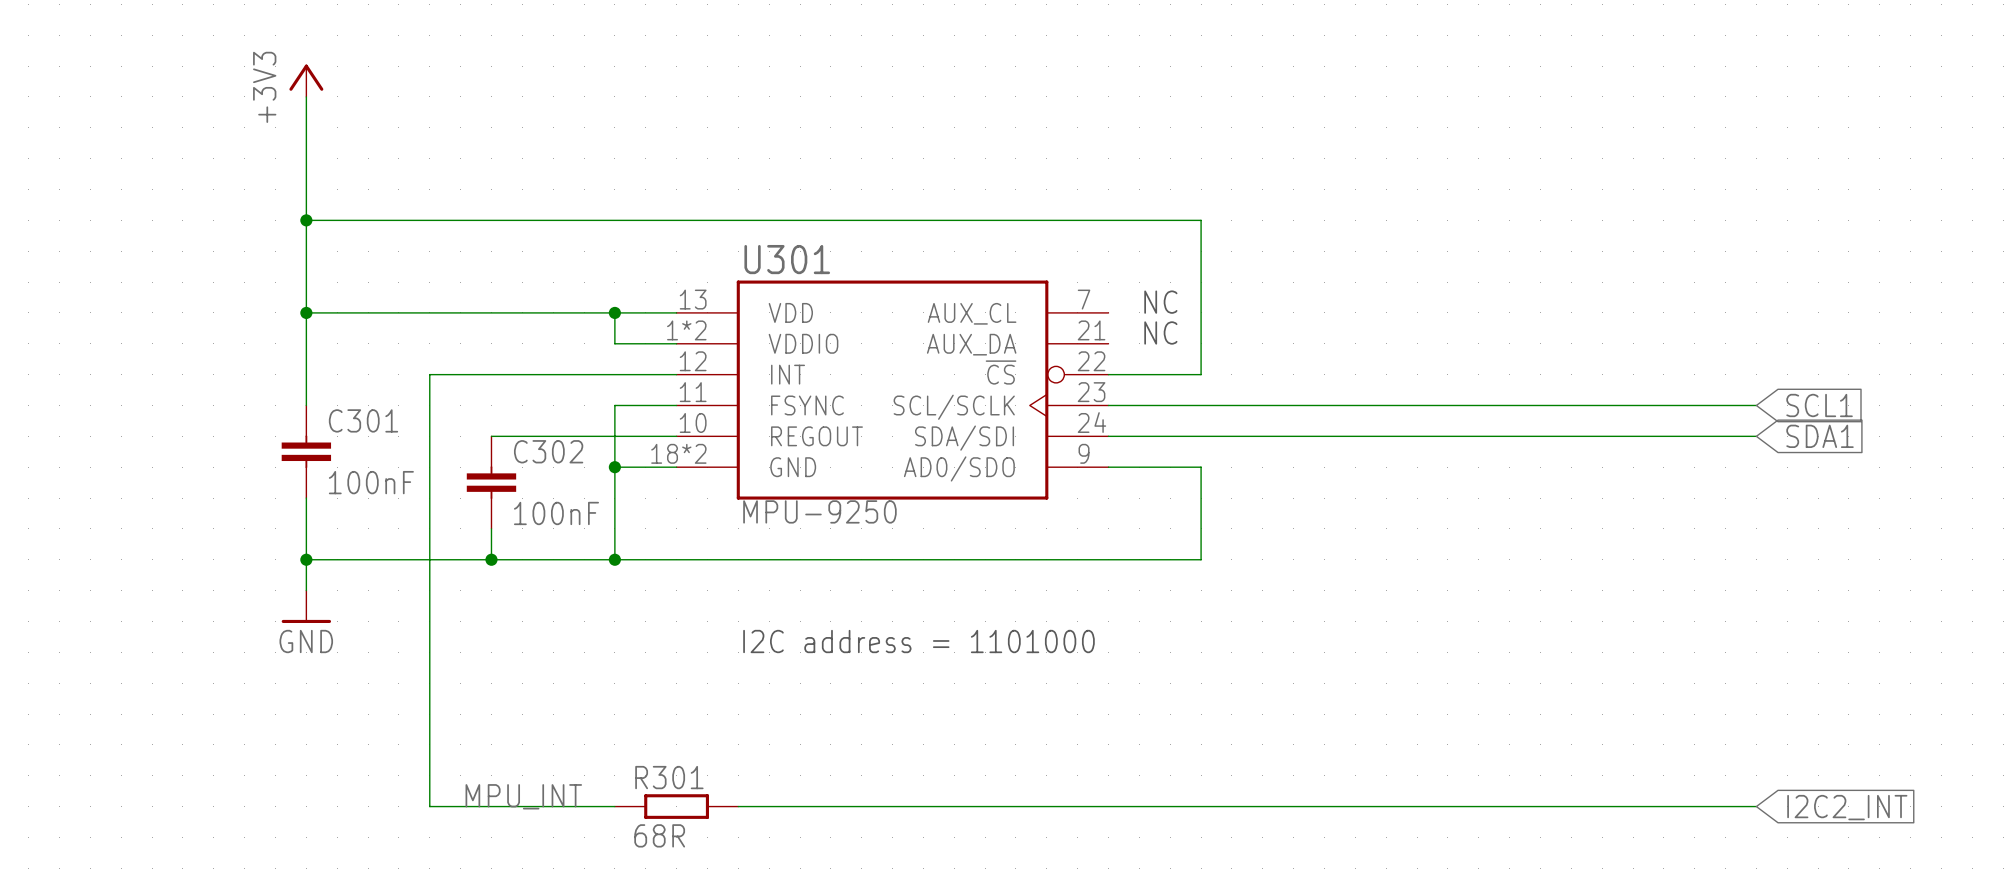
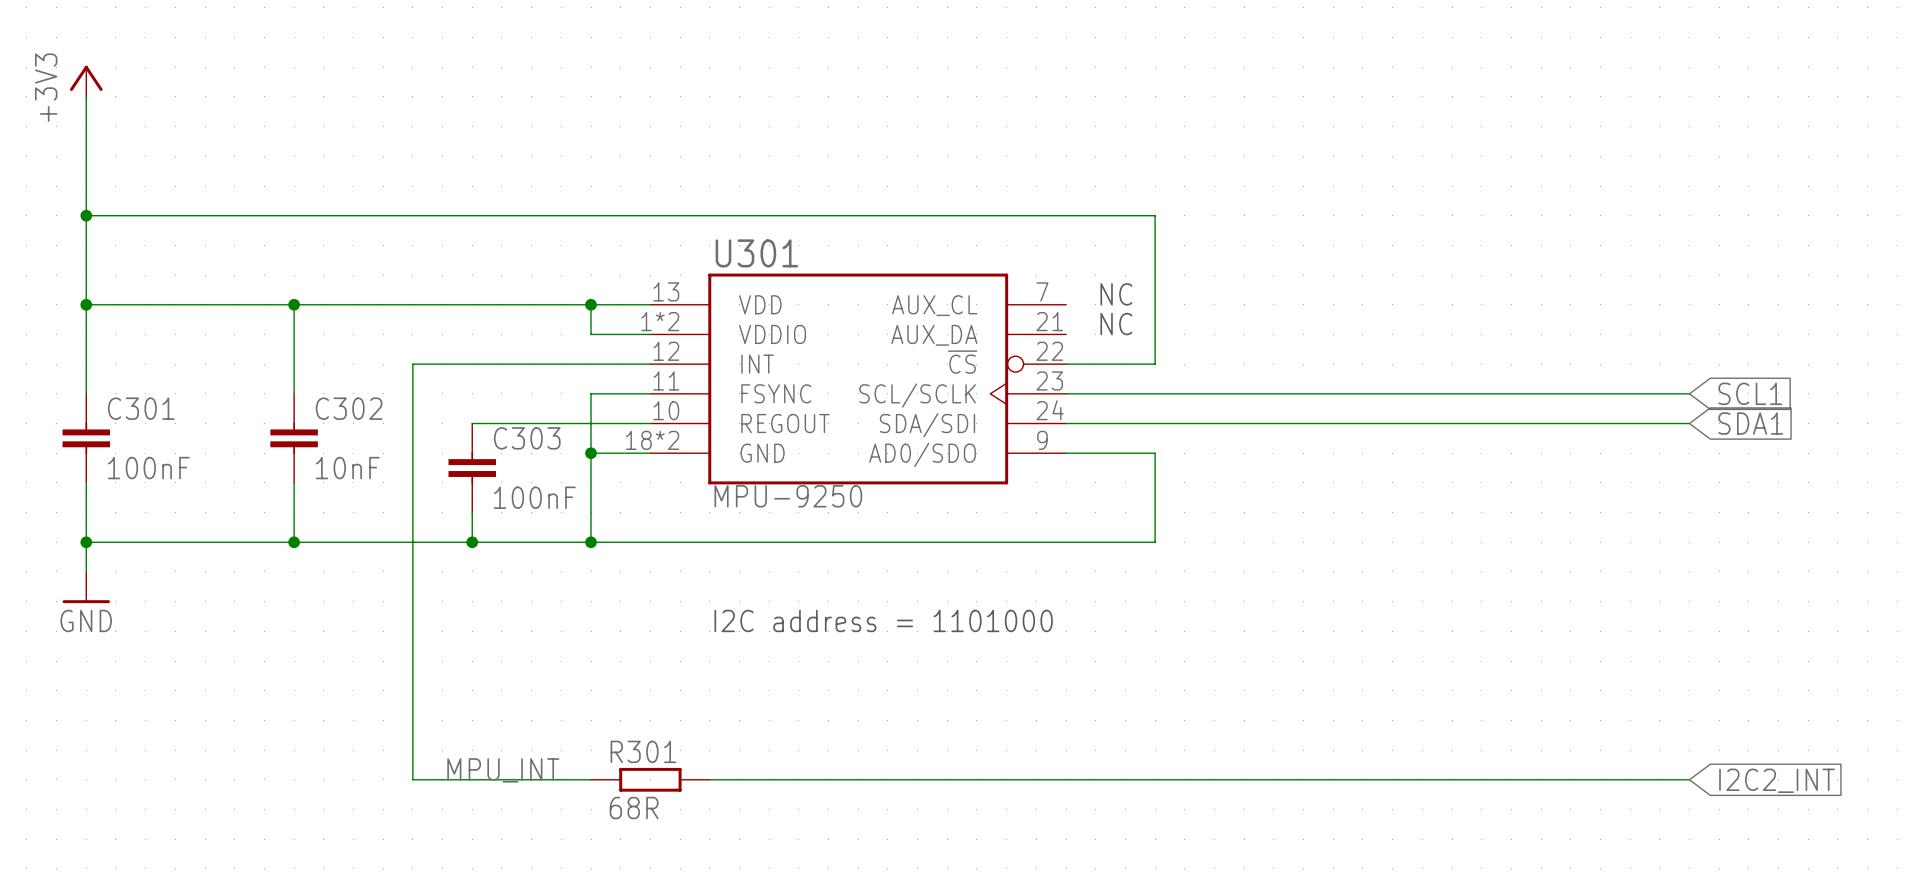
power symbol position: +3V3 (306, 80) -> +3V3 (86, 81)
wire: none -> (86, 96) (86, 393)
wire: (306, 96) (306, 312) -> (86, 304) (294, 304)
wire: none -> (86, 215) (294, 215)
junction: none -> (86, 215)
junction: (306, 220) -> none
junction: none -> (86, 304)
C301 name: C301 (363, 420) -> C302 (349, 408)
C301: none -> 100nF (86, 438)
C302 name: C302 (548, 451) -> C303 (527, 438)
C301 value: 100nF (371, 482) -> 10nF (347, 468)
wire: none -> (86, 482) (86, 571)
junction: none -> (86, 542)
wire: (306, 559) (306, 590) -> (294, 542) (86, 542)
power symbol position: GND (306, 606) -> GND (86, 587)

